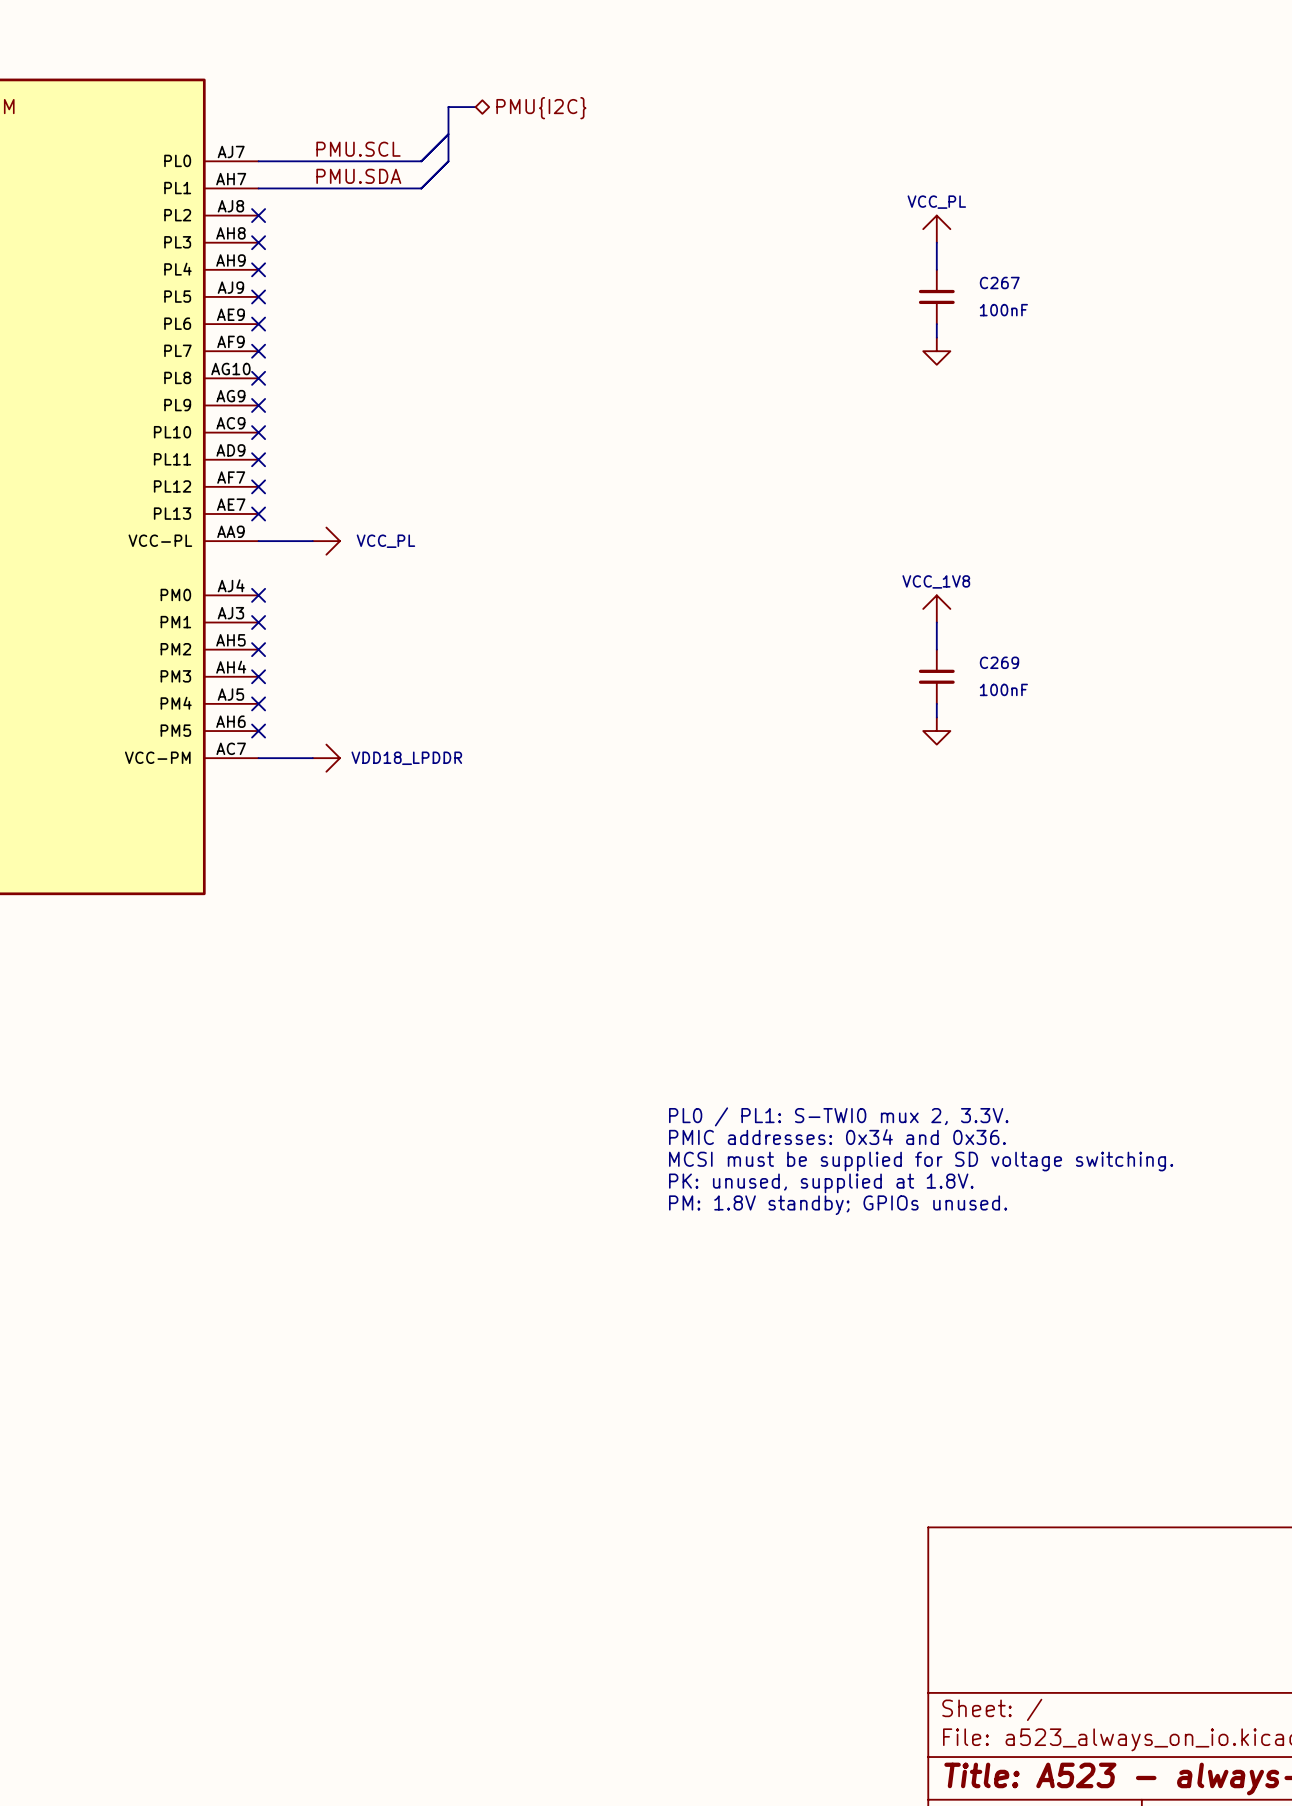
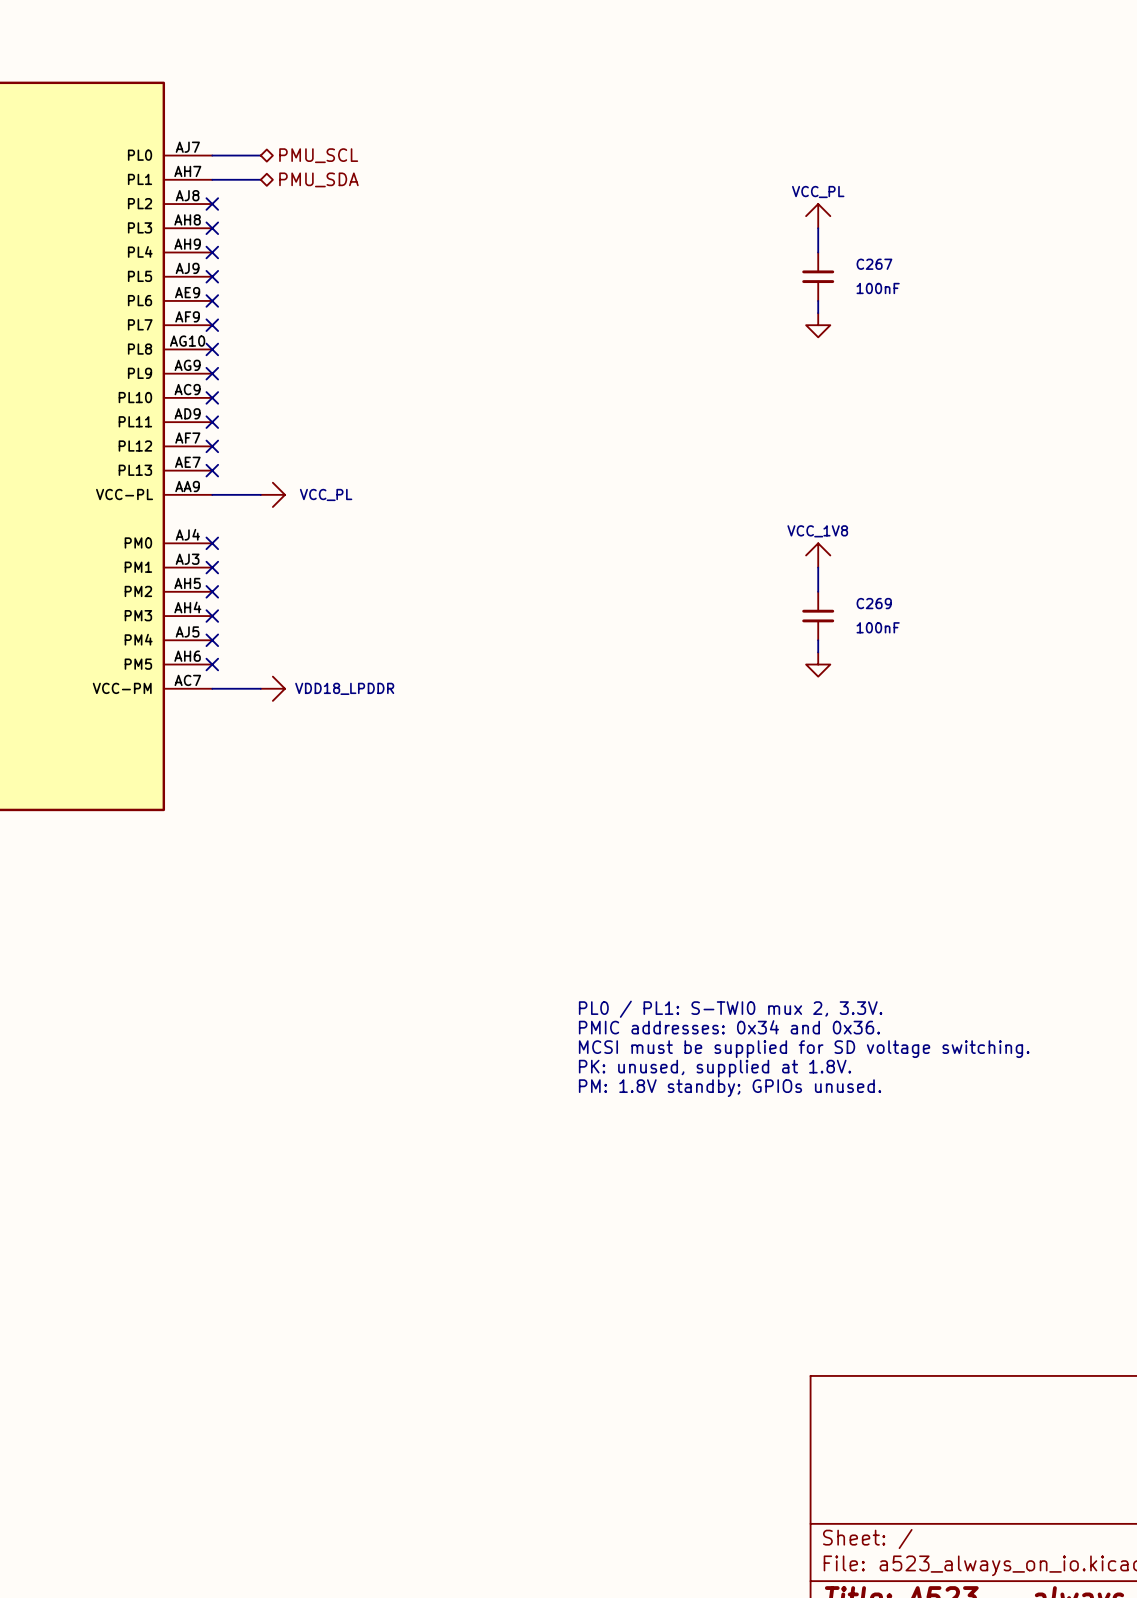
bus: (475, 107) (448, 107) (448, 161) -> none
hierarchical label: PMU{I2C} (541, 108) -> none
wire: (448, 134) (421, 161) (312, 161) -> none
label: PMU.SCL (358, 149) -> none
hierarchical label: none -> PMU_SCL (318, 155)
wire: (448, 161) (421, 188) (312, 188) -> none
label: PMU.SDA (358, 176) -> none
hierarchical label: none -> PMU_SDA (318, 179)

